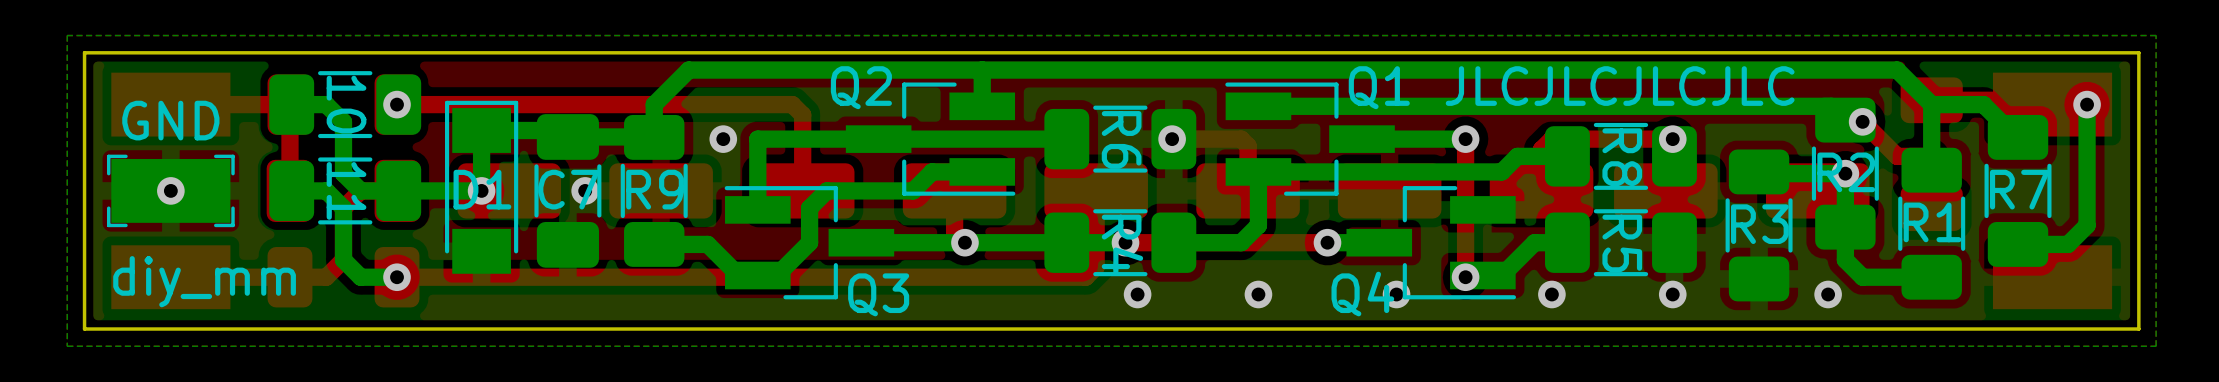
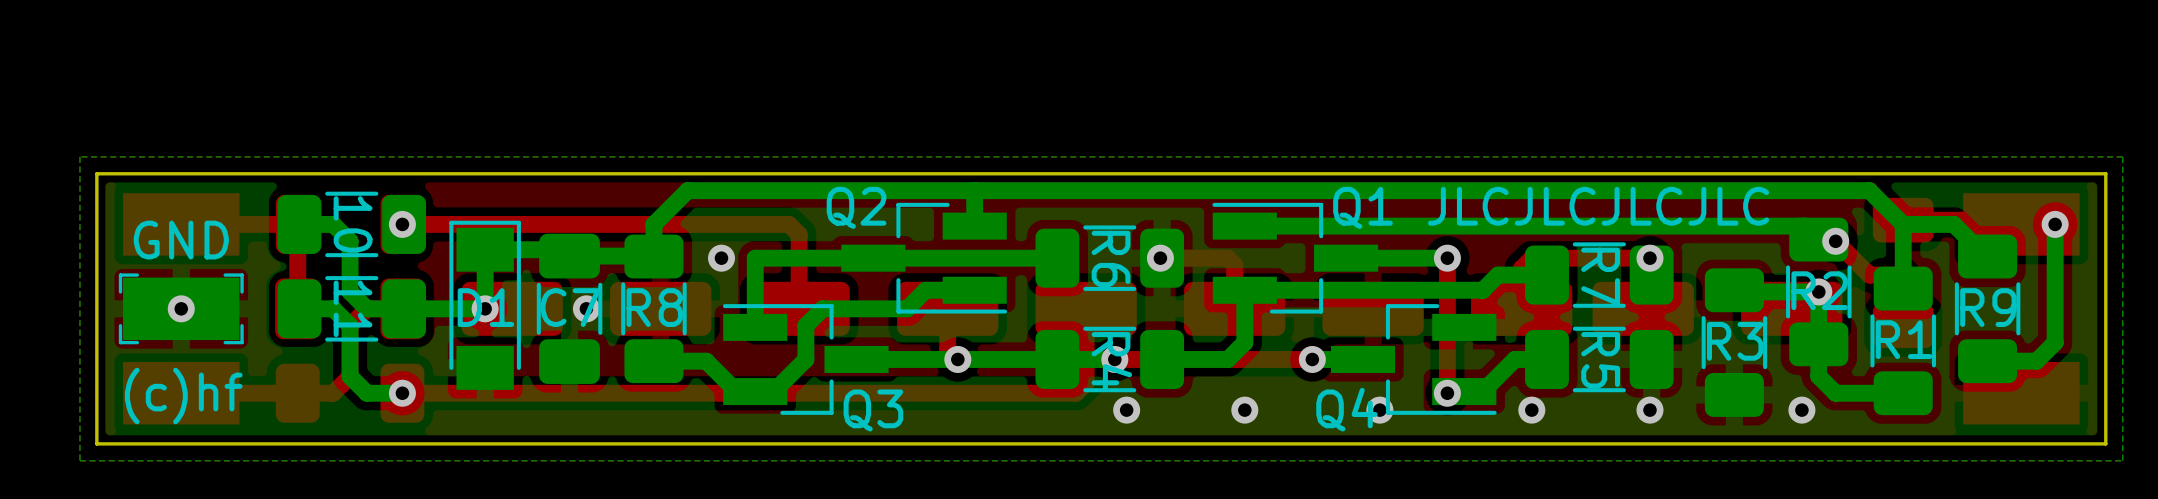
R8 name: R8 (1622, 157) -> R7 (1600, 276)
R9 name: R9 (655, 189) -> R8 (654, 307)
R7 name: R7 (2019, 189) -> R9 (1988, 307)
text: diy_mm (204, 281) -> (c)hf (183, 396)

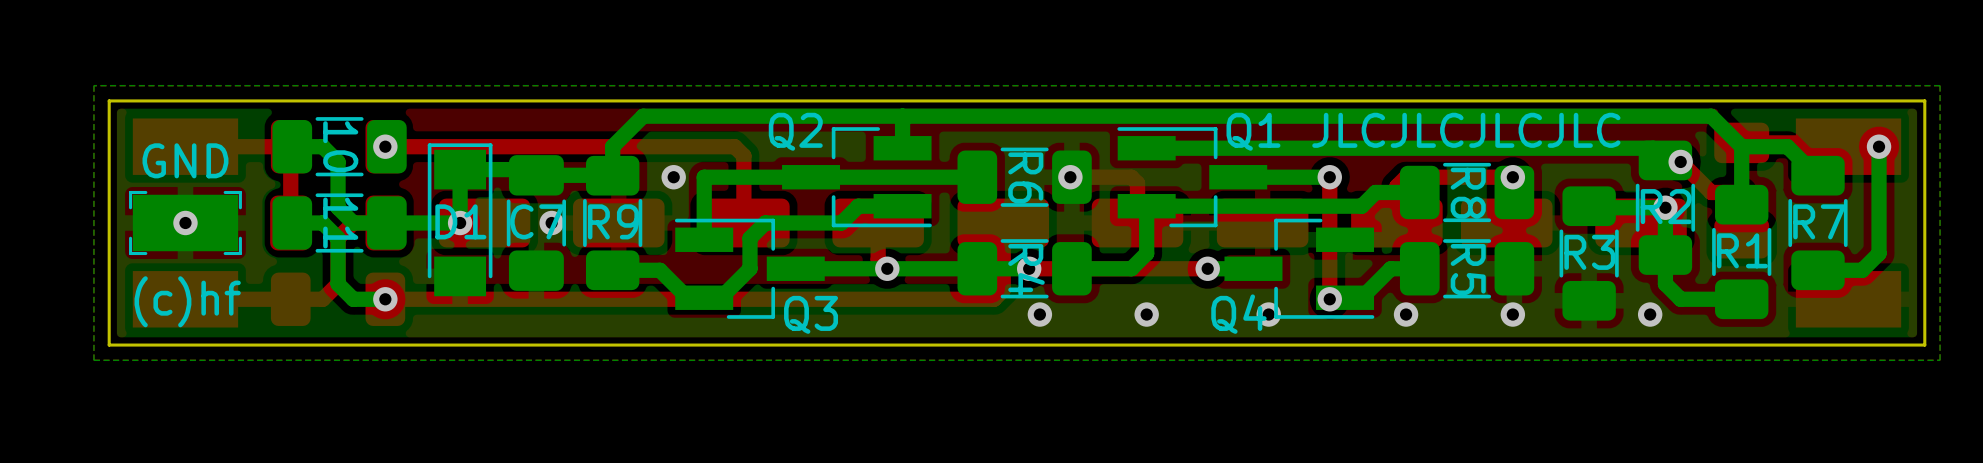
R7 name: R7 (1600, 276) -> R8 (1468, 193)
R8 name: R8 (654, 307) -> R9 (613, 221)
R9 name: R9 (1988, 307) -> R7 (1819, 221)

